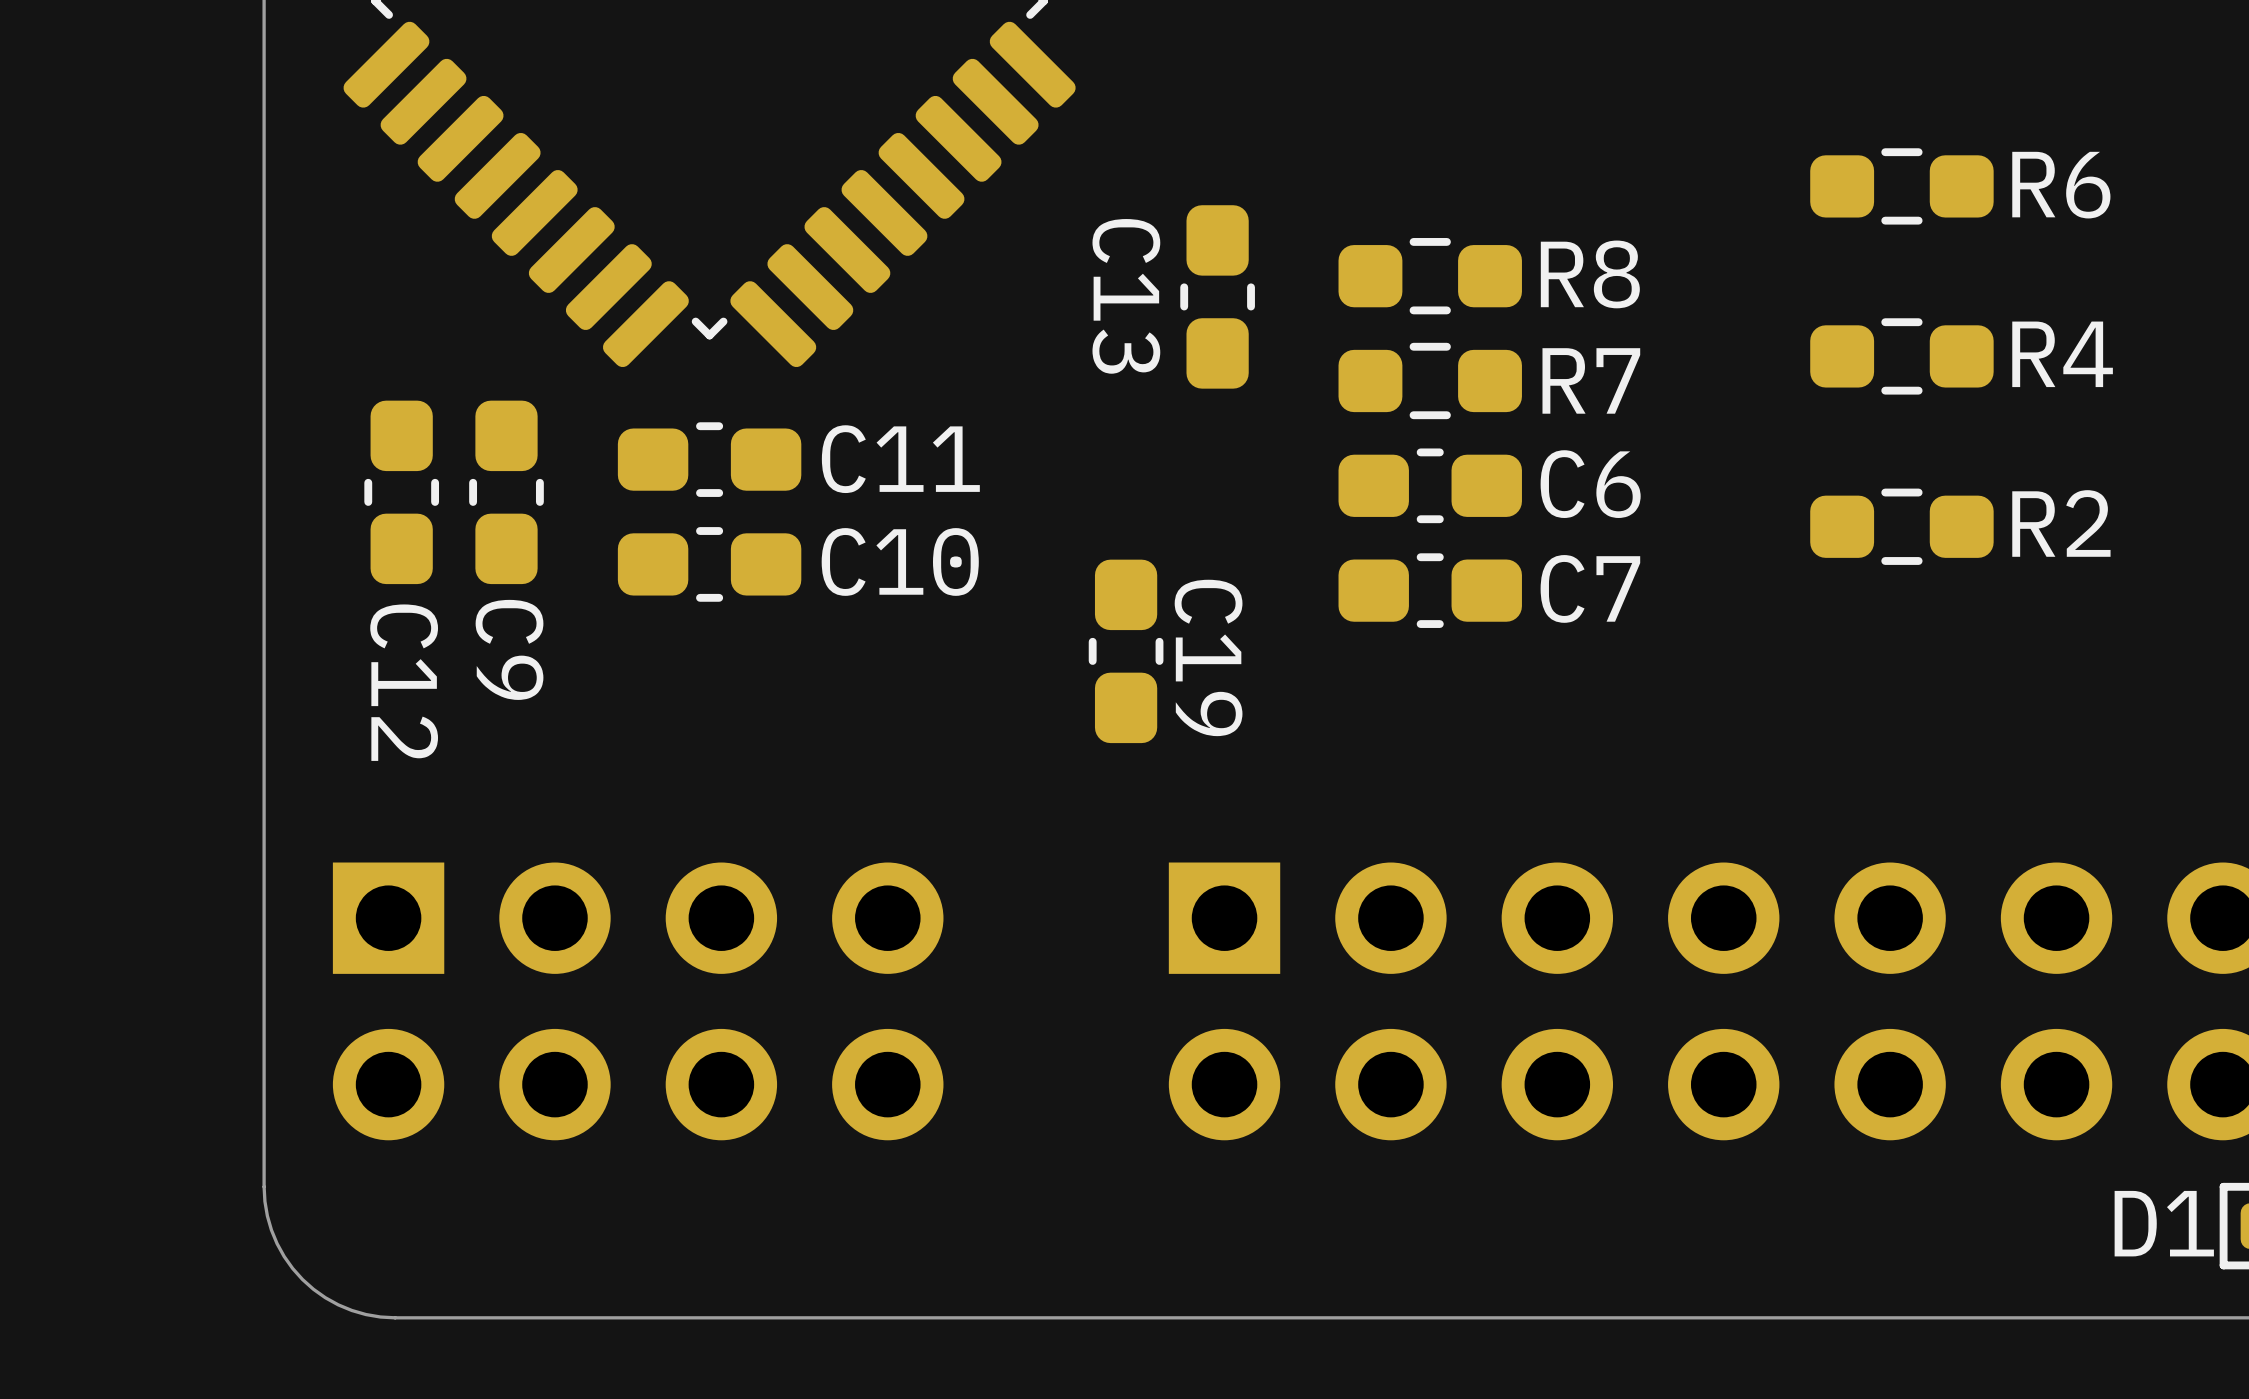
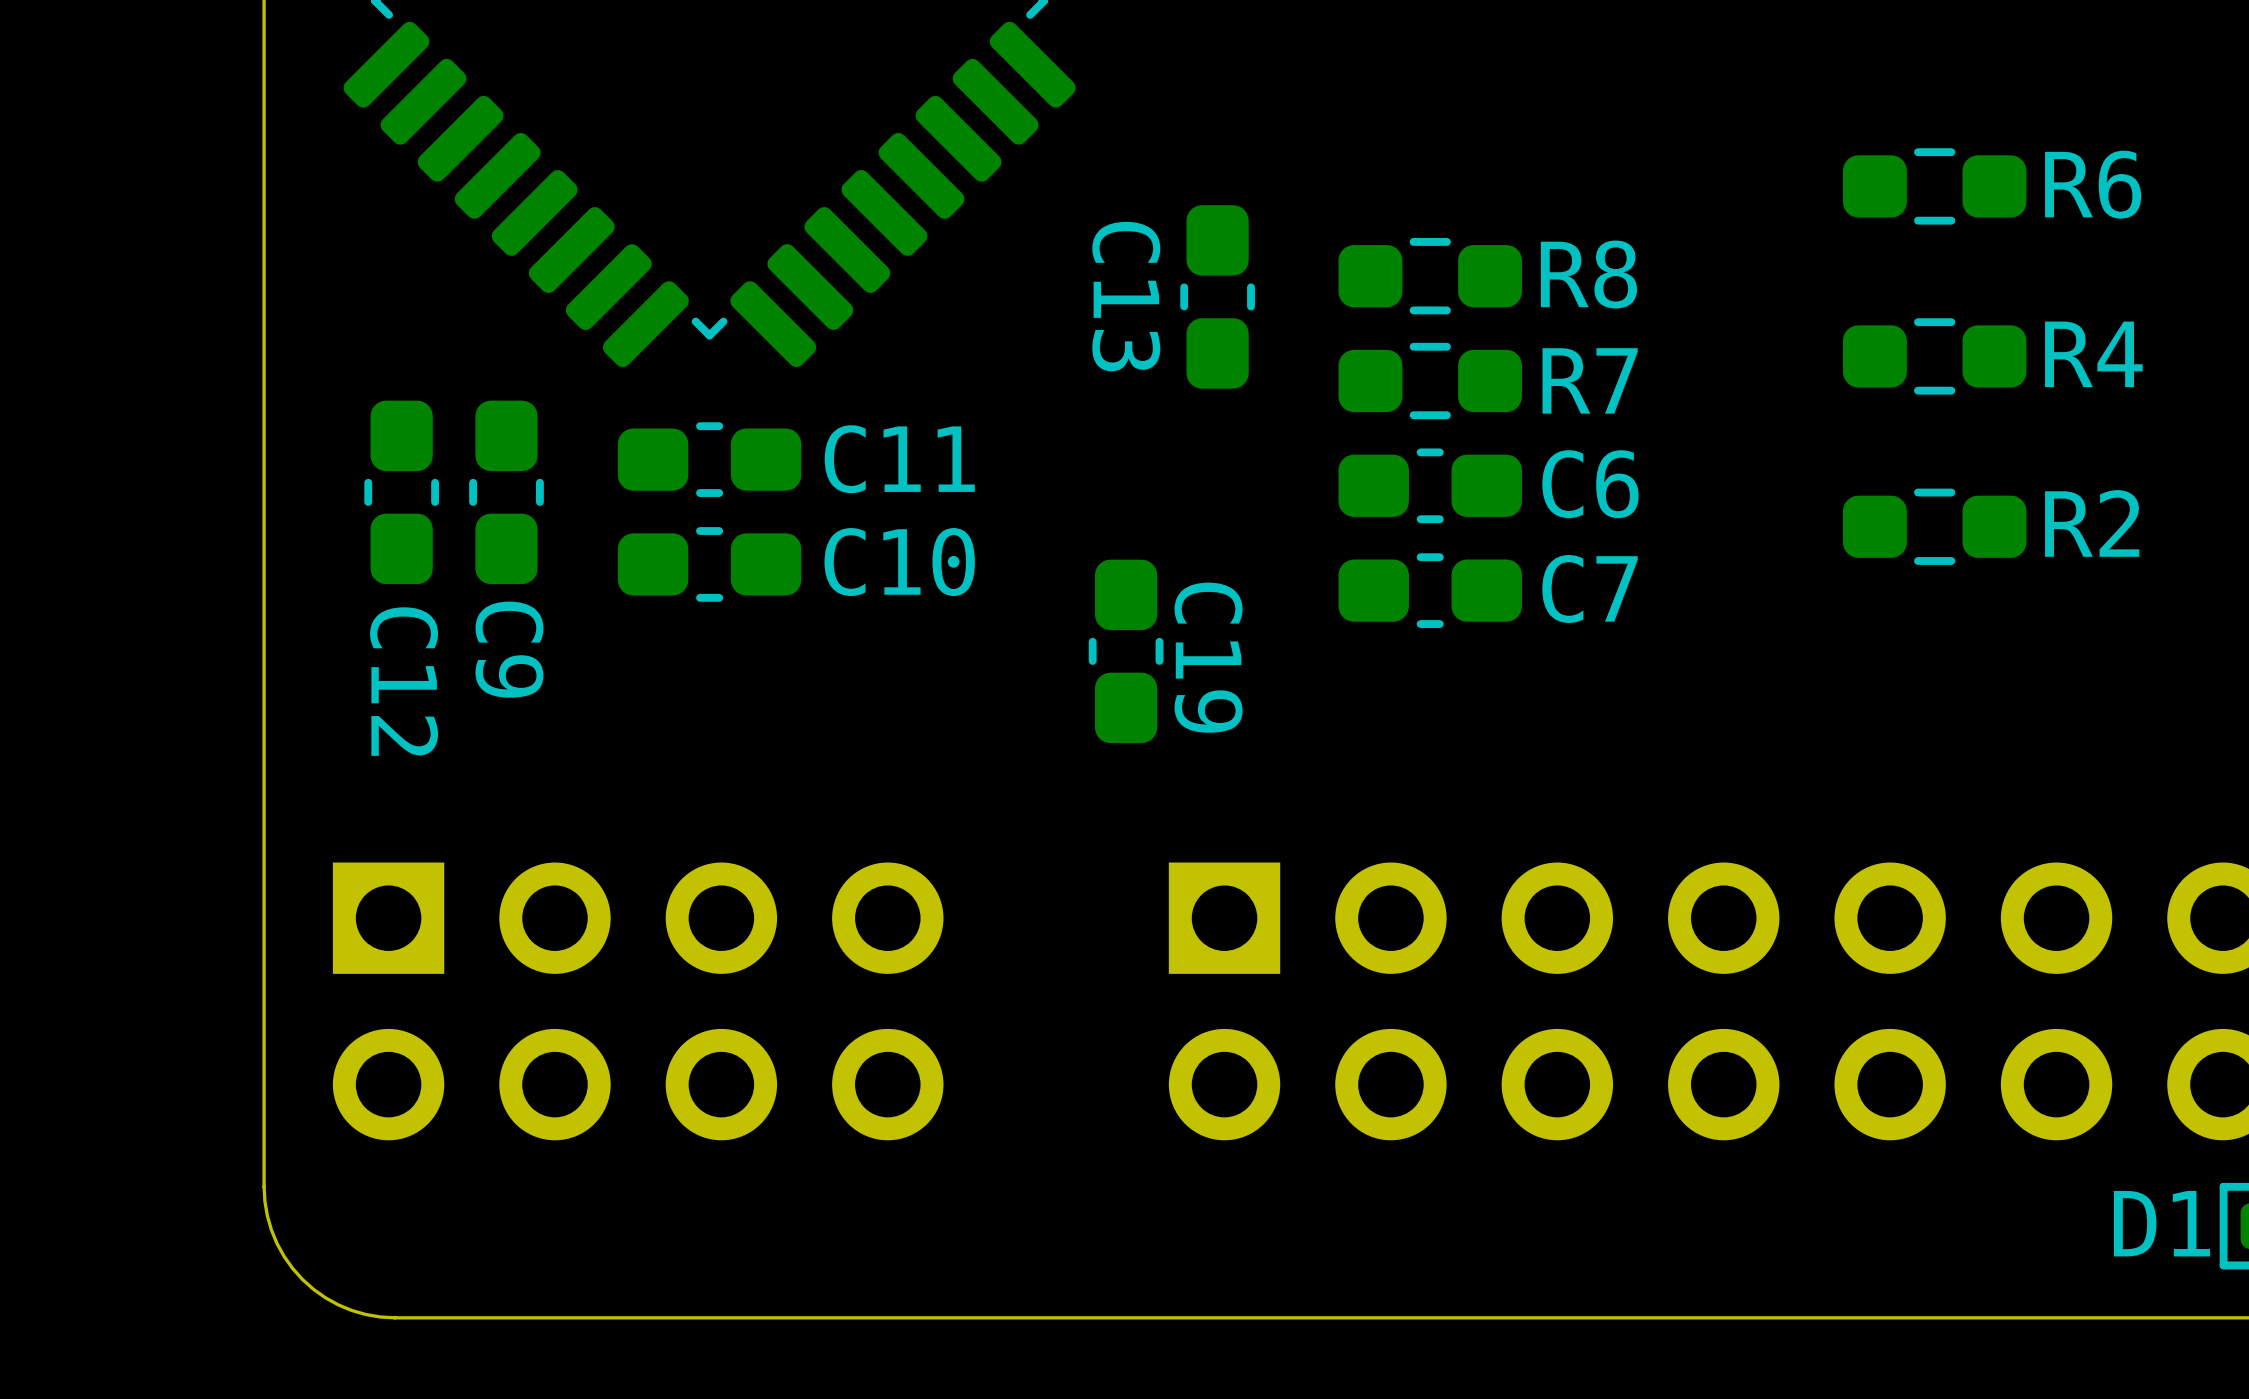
R6 position: (1901, 186) -> (1934, 186)
R4 position: (1901, 356) -> (1934, 356)
R2 position: (1901, 526) -> (1934, 526)

